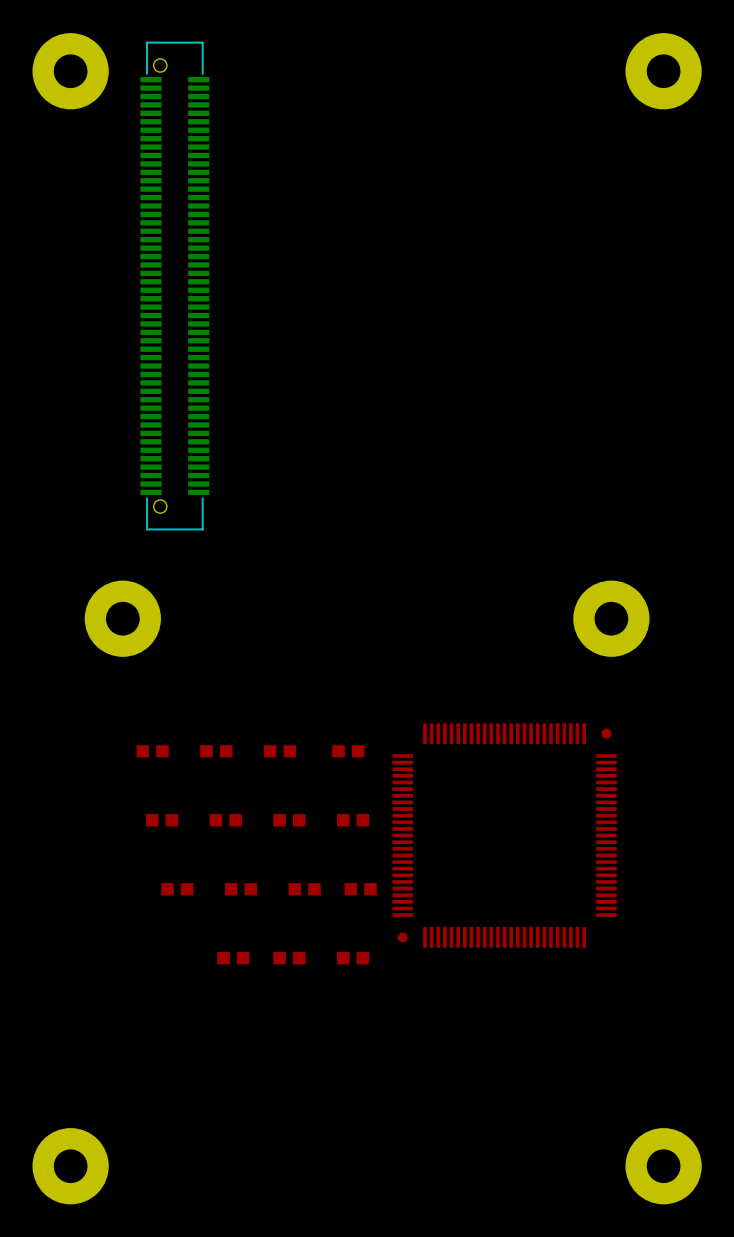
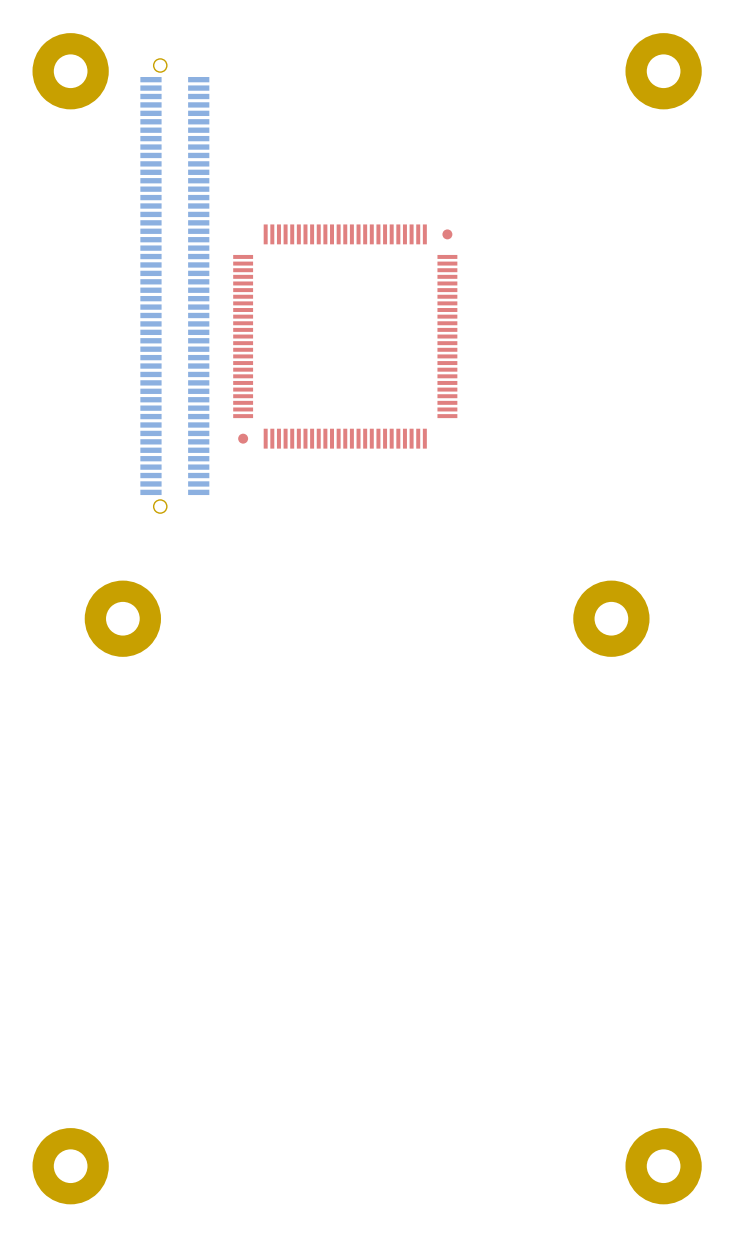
part footprint: [140, 41, 210, 531] -> [140, 58, 210, 514]
part: none -> (345, 336)
part: (152, 751) -> none
part: (216, 751) -> none
part: (280, 751) -> none
part: (348, 751) -> none
part: (162, 820) -> none
part: (225, 820) -> none
part: (289, 820) -> none
part: (353, 820) -> none
part: (504, 835) -> none
part: (177, 889) -> none
part: (241, 889) -> none
part: (304, 889) -> none
part: (360, 889) -> none
part: (233, 958) -> none
part: (289, 958) -> none
part: (353, 958) -> none

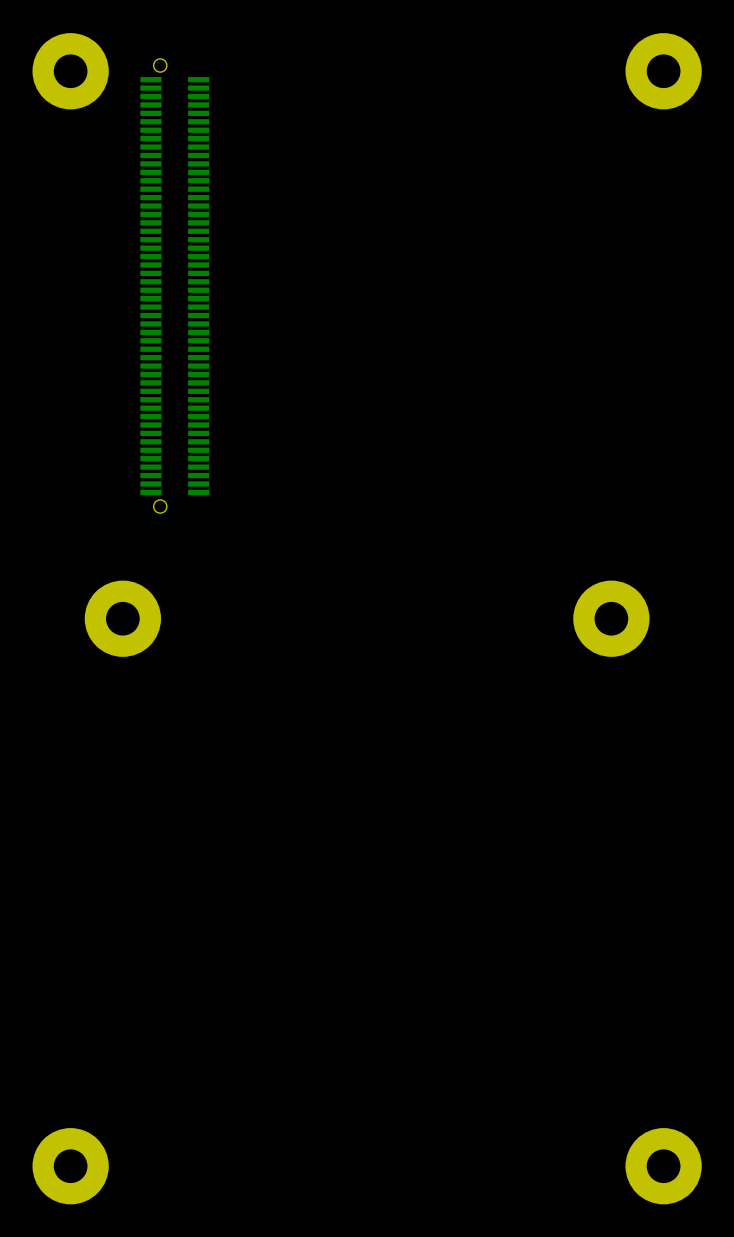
part: (345, 336) -> none

